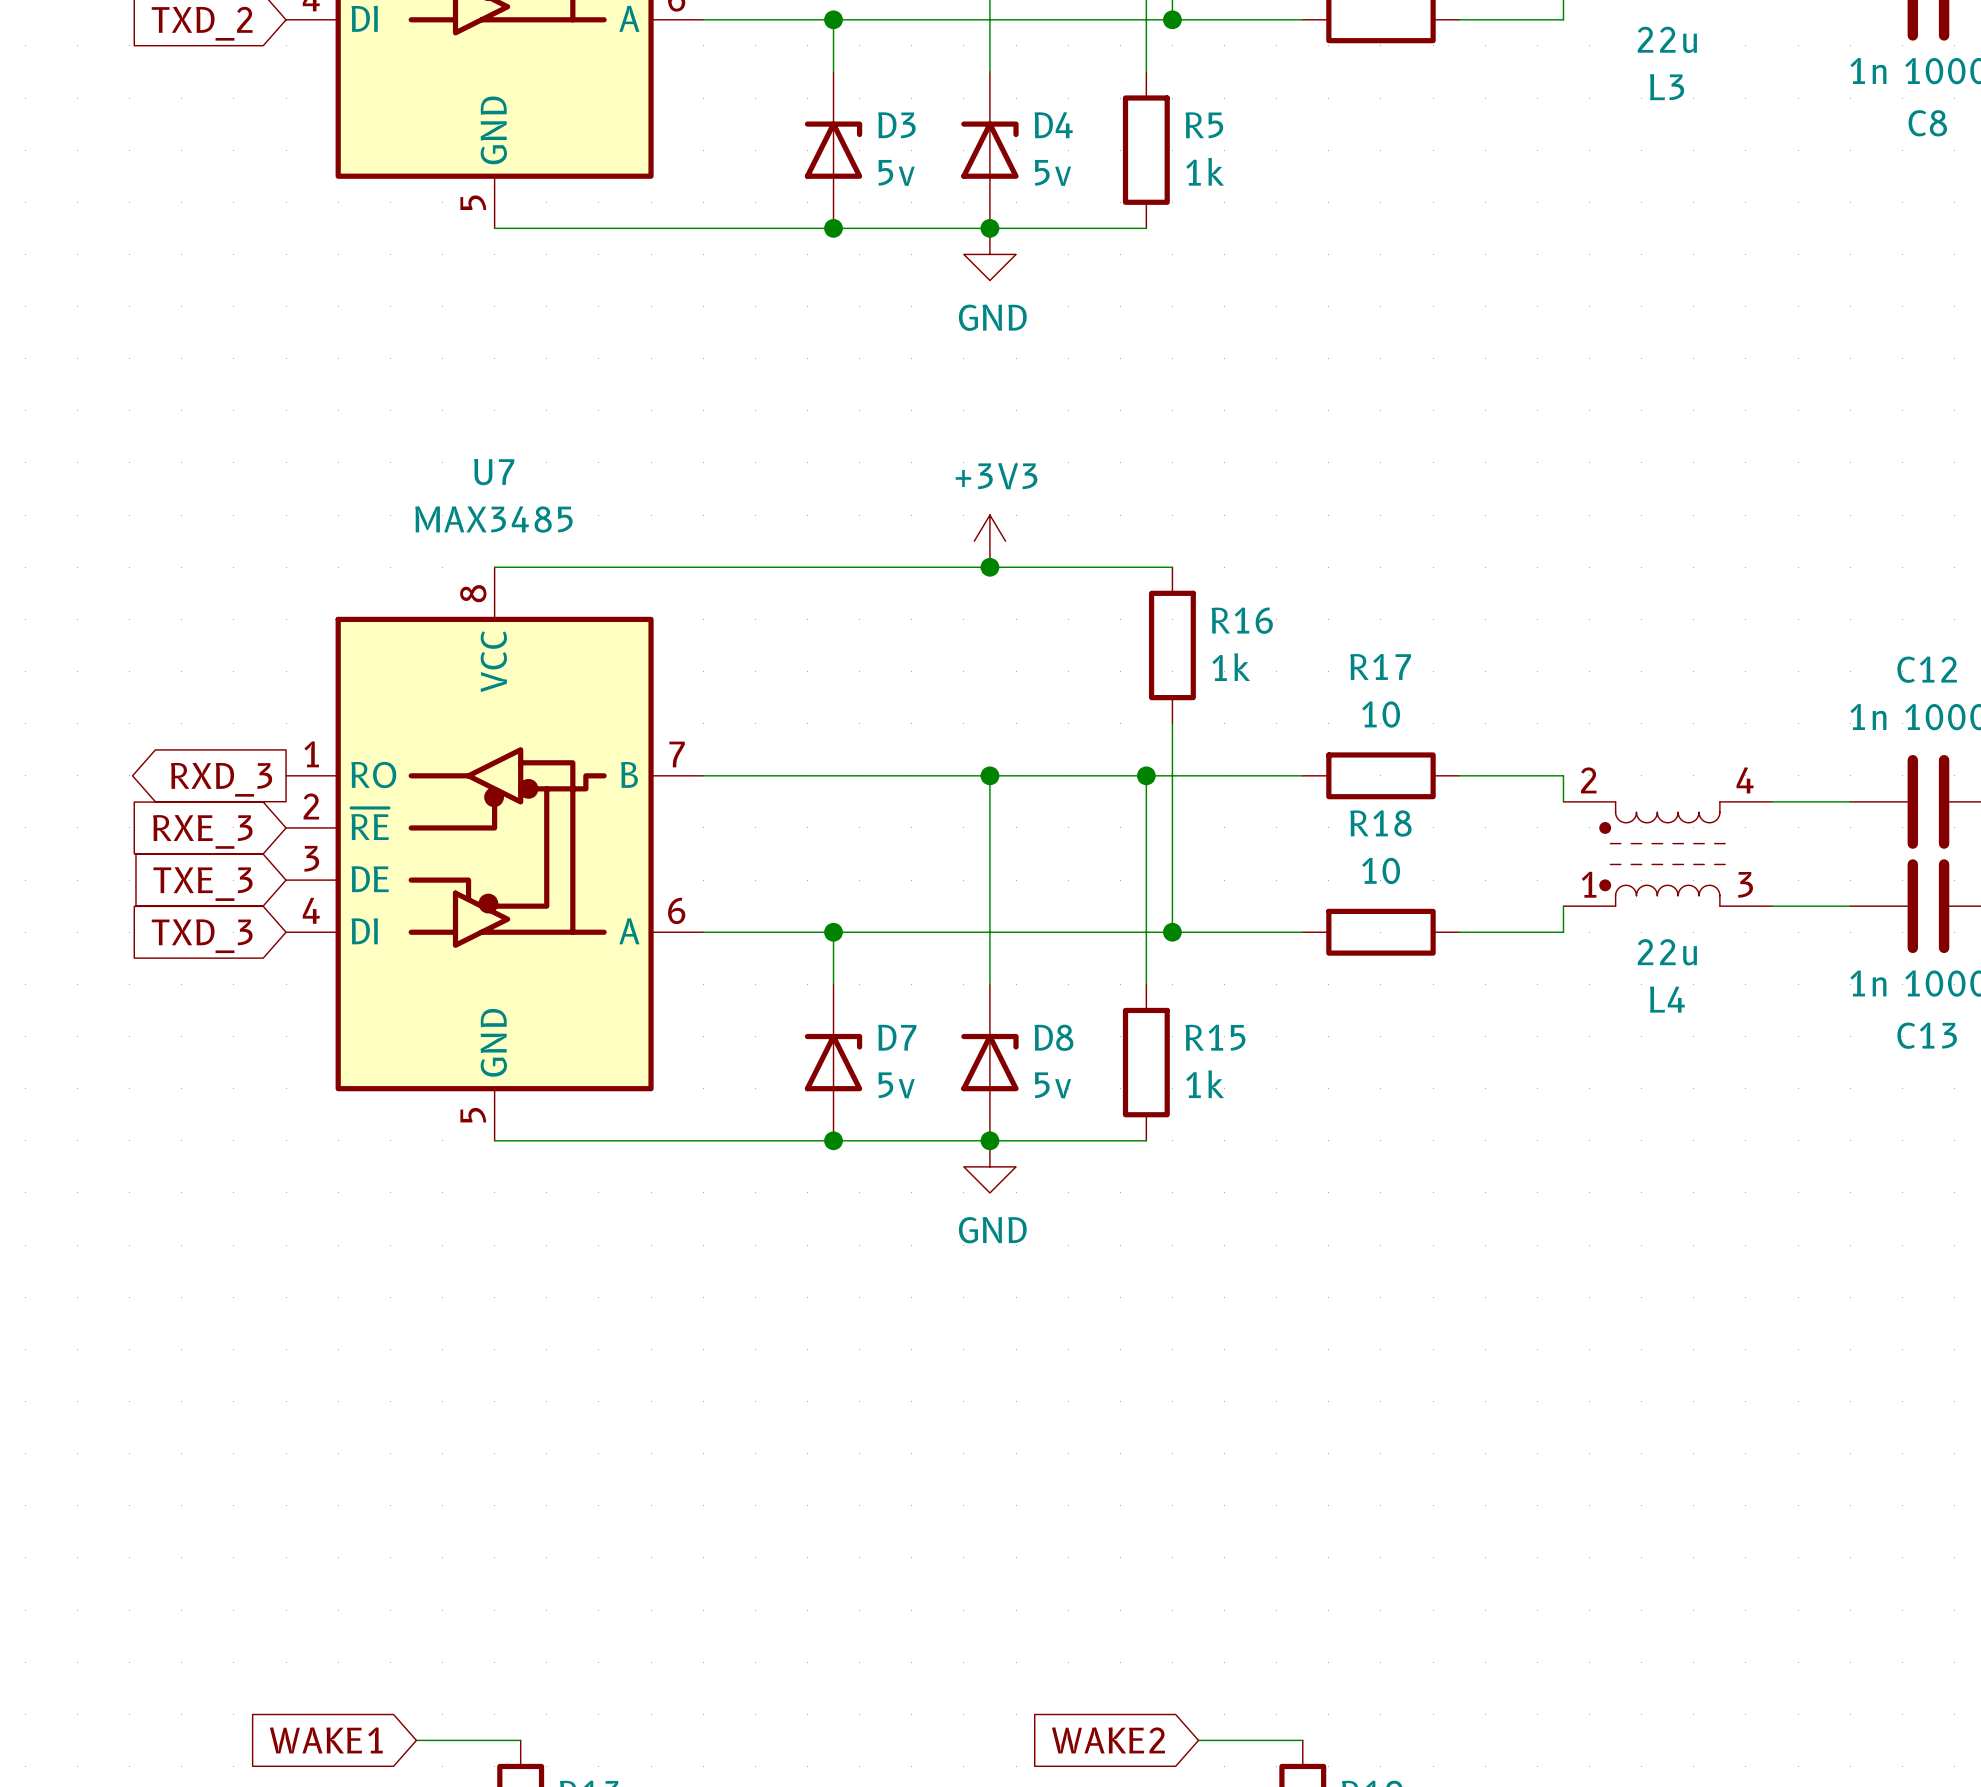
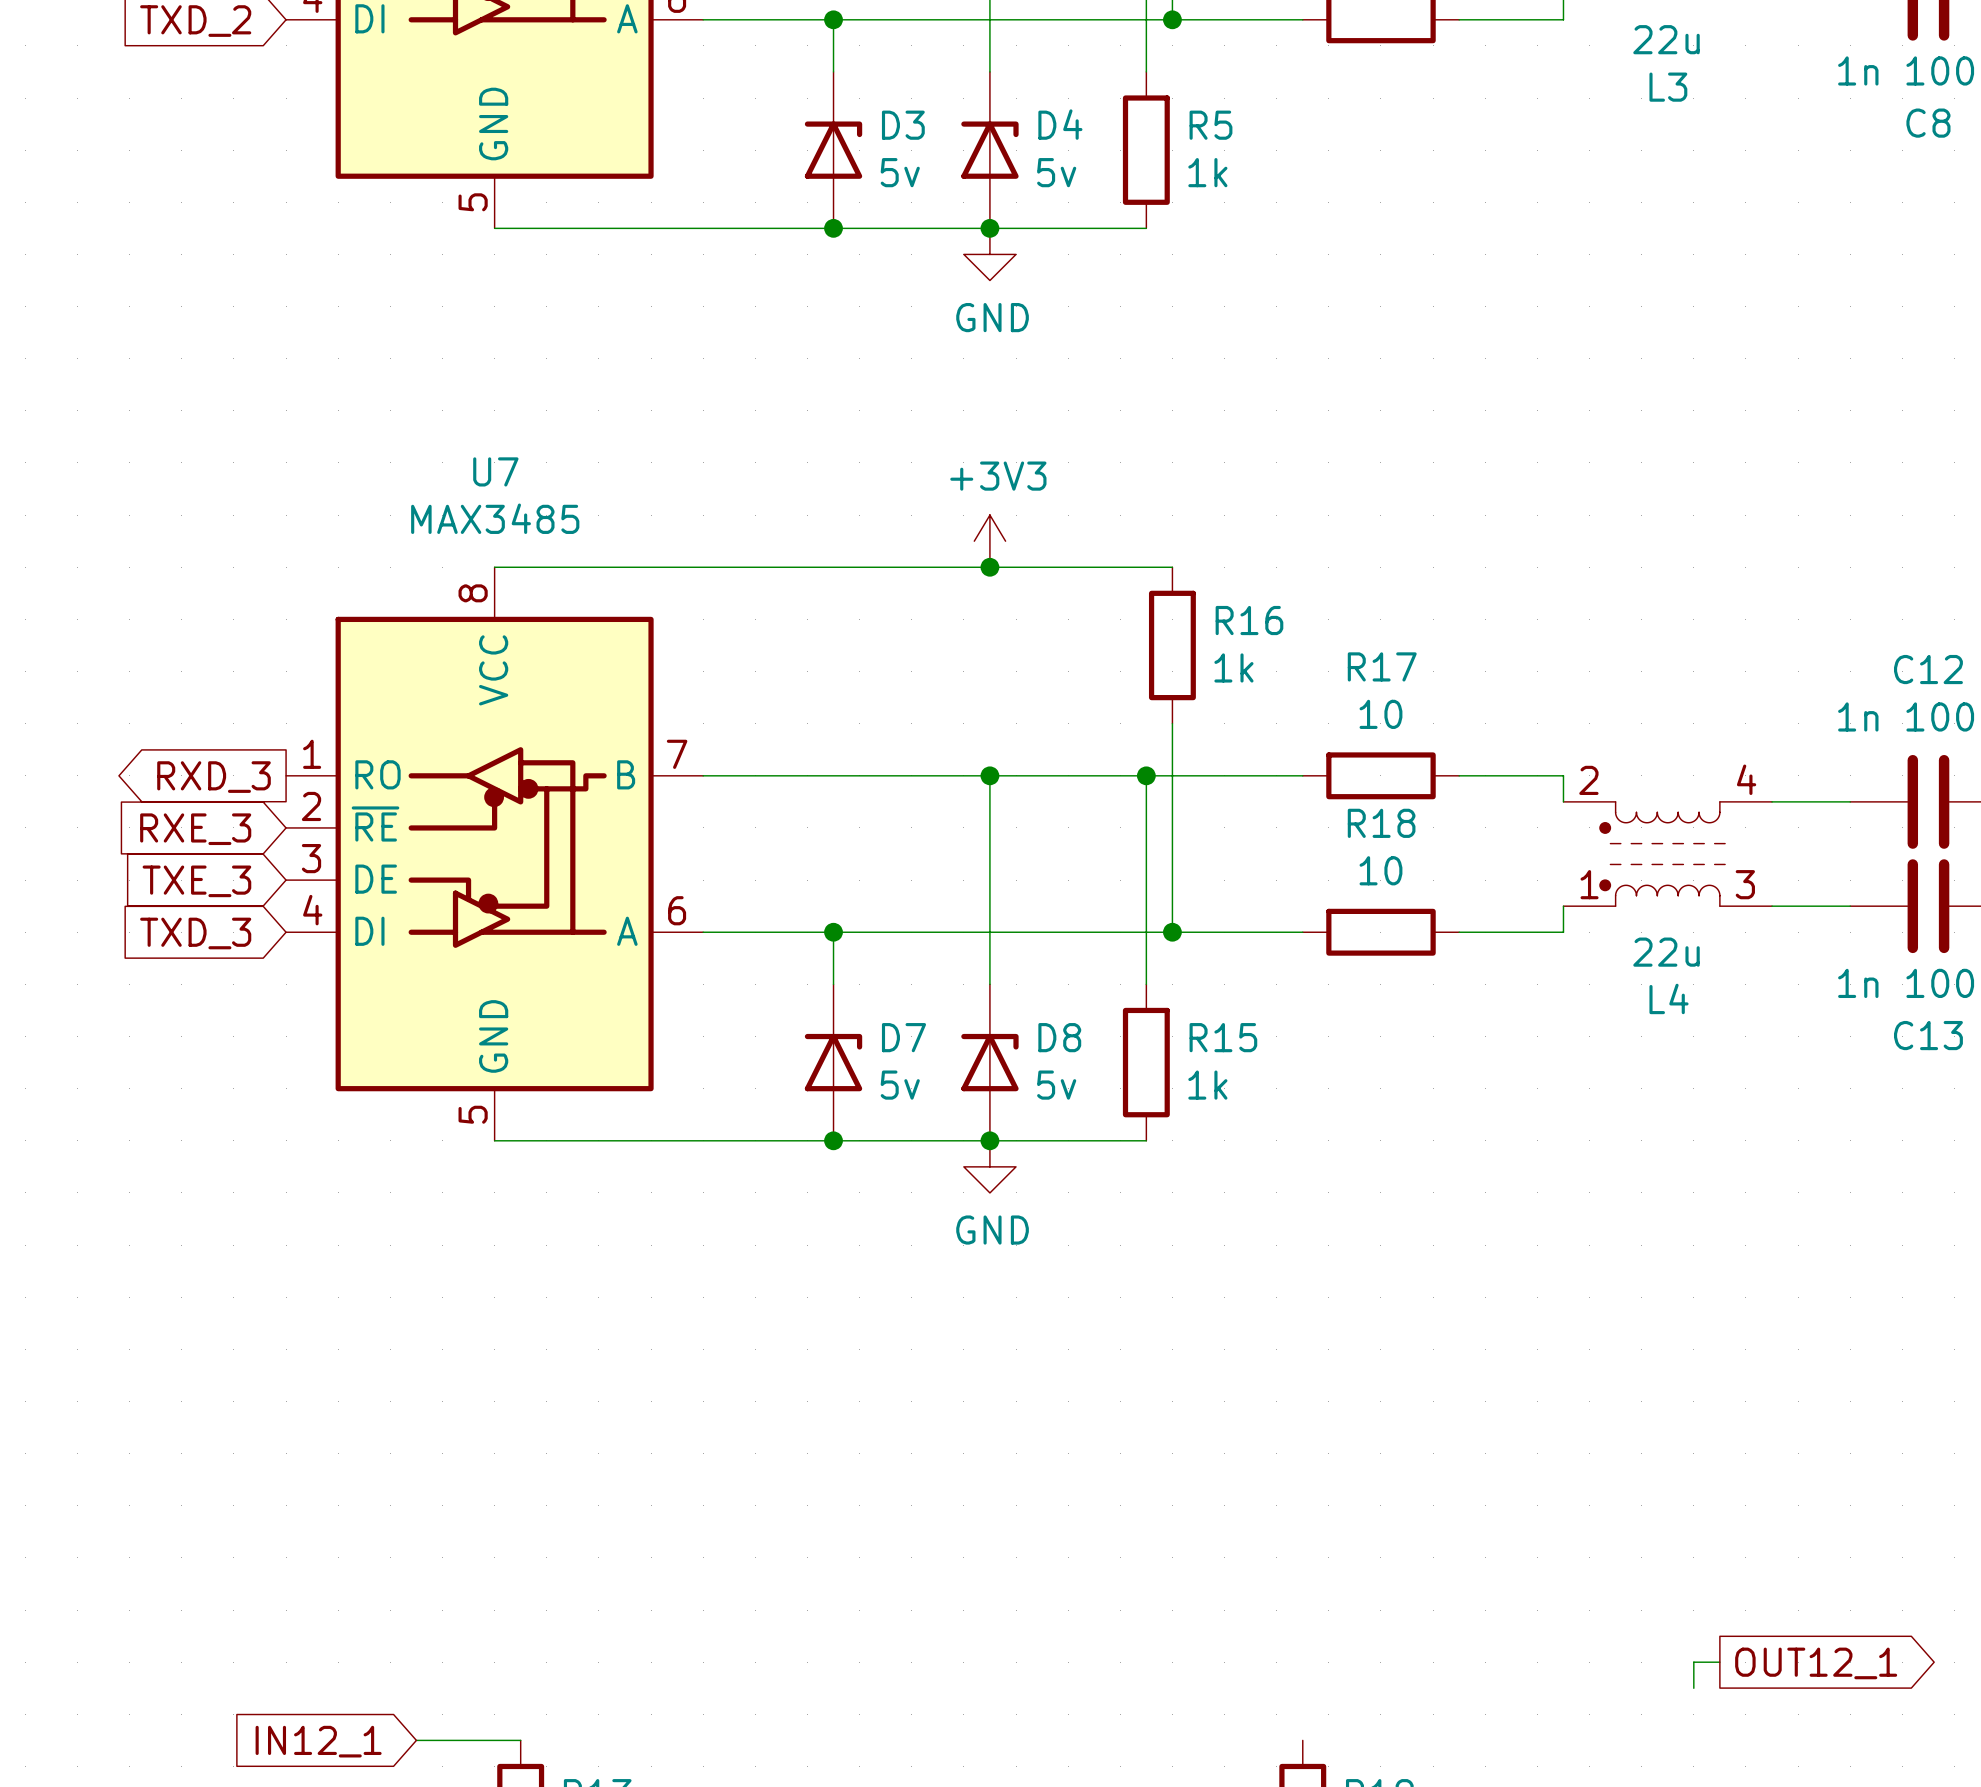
wire: none -> (1719, 1662) (1693, 1662) (1693, 1688)
global label: none -> OUT12_1 (1816, 1663)
global label: WAKE1 (326, 1740) -> IN12_1 (318, 1741)
global label: WAKE2 (1108, 1740) -> none
wire: (1198, 1740) (1302, 1740) -> none

